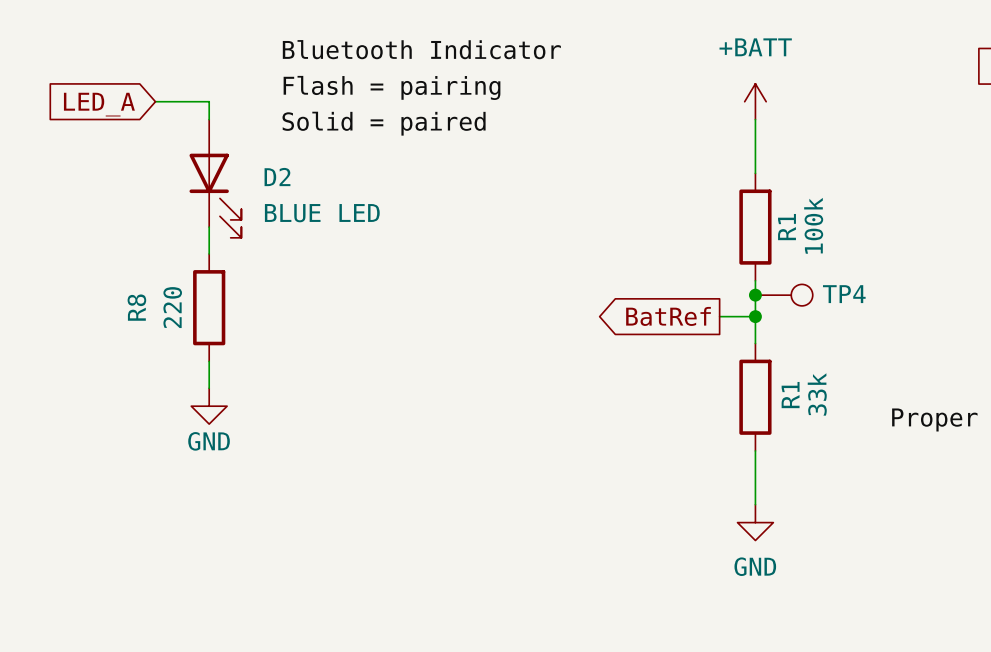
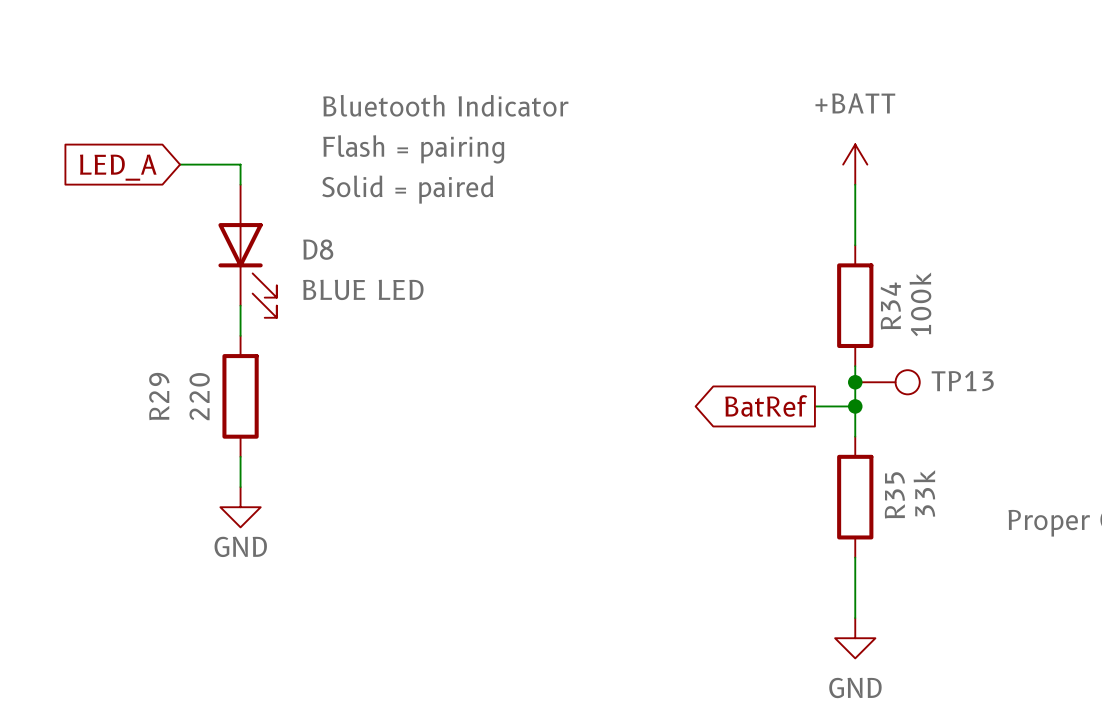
D2 name: D2 (277, 177) -> D8 (318, 249)
R1 name: R1 (787, 227) -> R34 (890, 305)
TP4 name: TP4 (844, 294) -> TP13 (962, 381)
R8 name: R8 (136, 307) -> R29 (159, 396)
R1 name: R1 (790, 395) -> R35 (894, 495)

